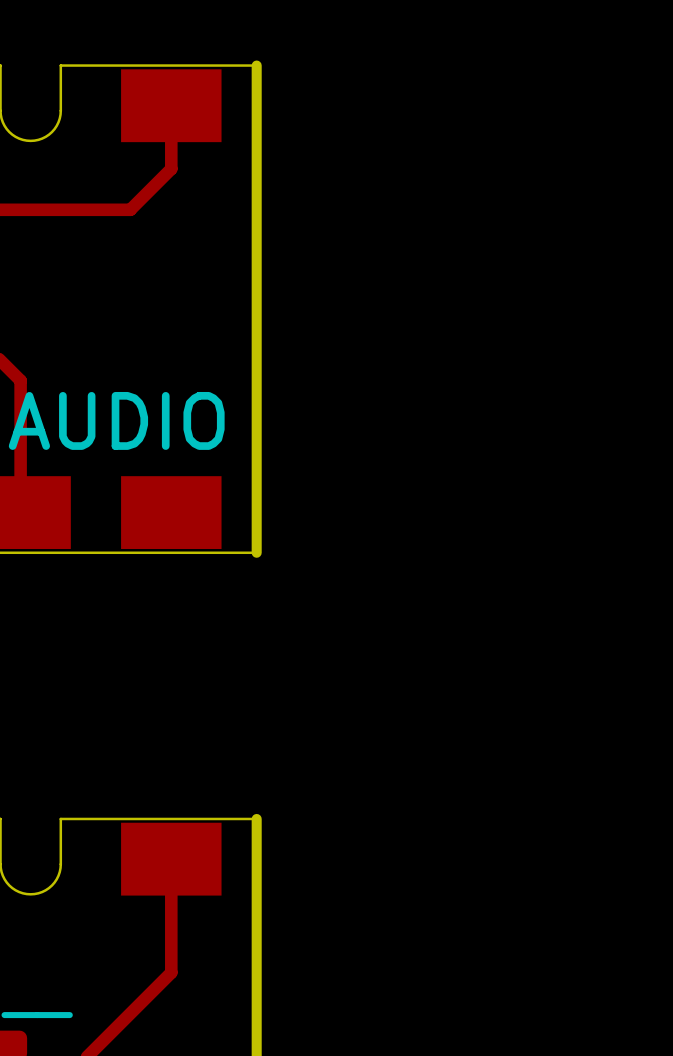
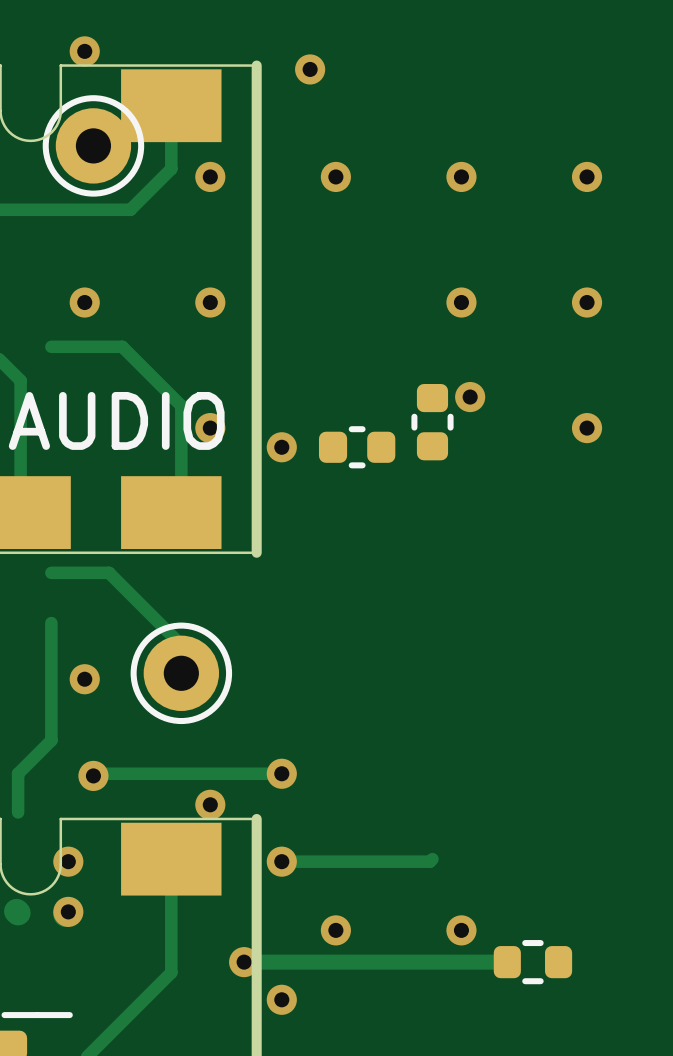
via: none -> (84, 51)
via: none -> (310, 69)
part: none -> (93, 145)
via: none -> (210, 176)
via: none -> (335, 176)
via: none -> (461, 176)
via: none -> (587, 176)
via: none -> (84, 302)
via: none -> (210, 302)
via: none -> (461, 302)
via: none -> (587, 302)
track: none -> (51, 346) (122, 346) (181, 405) (181, 522)
via: none -> (470, 397)
part: none -> (432, 422)
via: none -> (210, 428)
via: none -> (587, 428)
via: none -> (281, 447)
part: none -> (357, 447)
track: none -> (51, 572) (109, 572) (181, 645) (181, 673)
track: none -> (51, 623) (51, 740) (18, 773) (18, 812)
part: none -> (181, 673)
via: none -> (84, 679)
track: none -> (281, 773) (95, 773) (93, 775)
via: none -> (281, 773)
via: none -> (93, 775)
via: none -> (210, 804)
track: none -> (432, 859) (429, 861) (281, 861)
via: none -> (68, 861)
via: none -> (281, 861)
track: none -> (16, 911) (18, 912)
via: none -> (68, 911)
via: none -> (335, 930)
via: none -> (461, 930)
track: none -> (244, 962) (507, 962)
via: none -> (244, 962)
part: none -> (532, 962)
via: none -> (281, 999)

